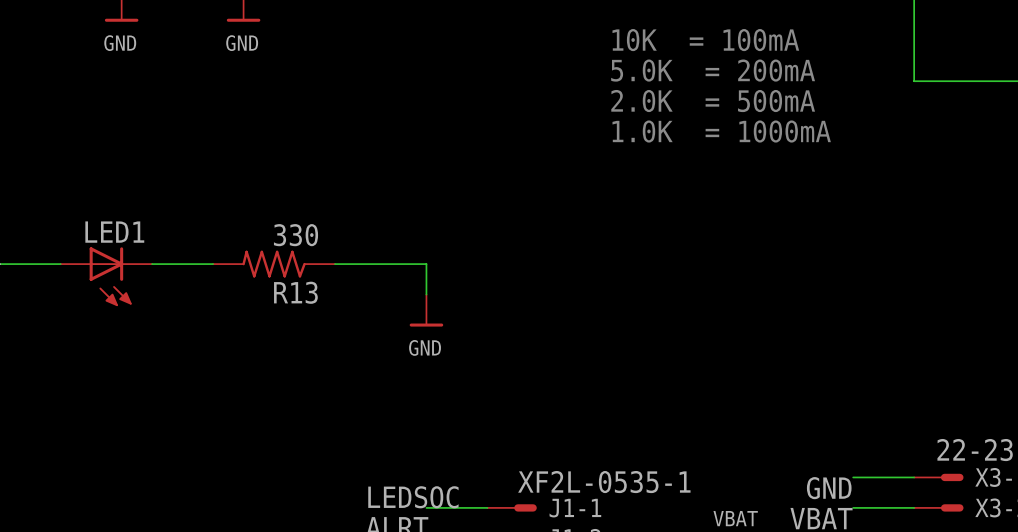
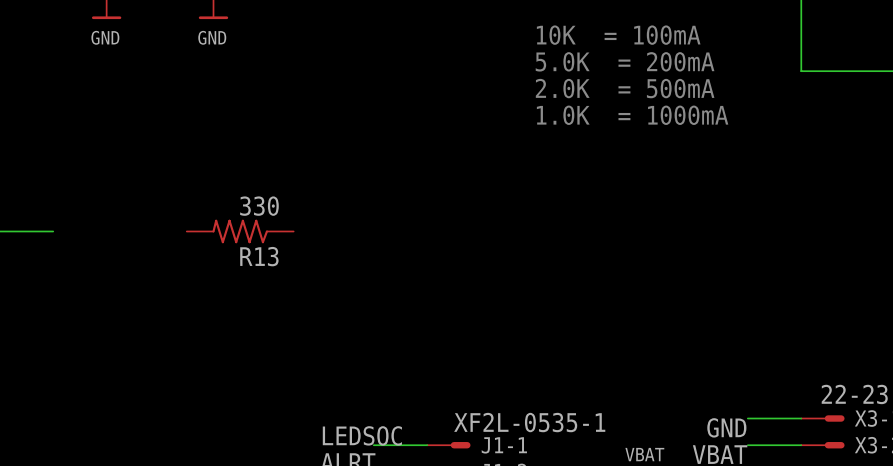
wire: (152, 264) (213, 264) -> none
wire: (335, 264) (426, 264) (426, 294) -> none
LED1: (106, 276) -> none
power symbol: GND (426, 310) -> none

